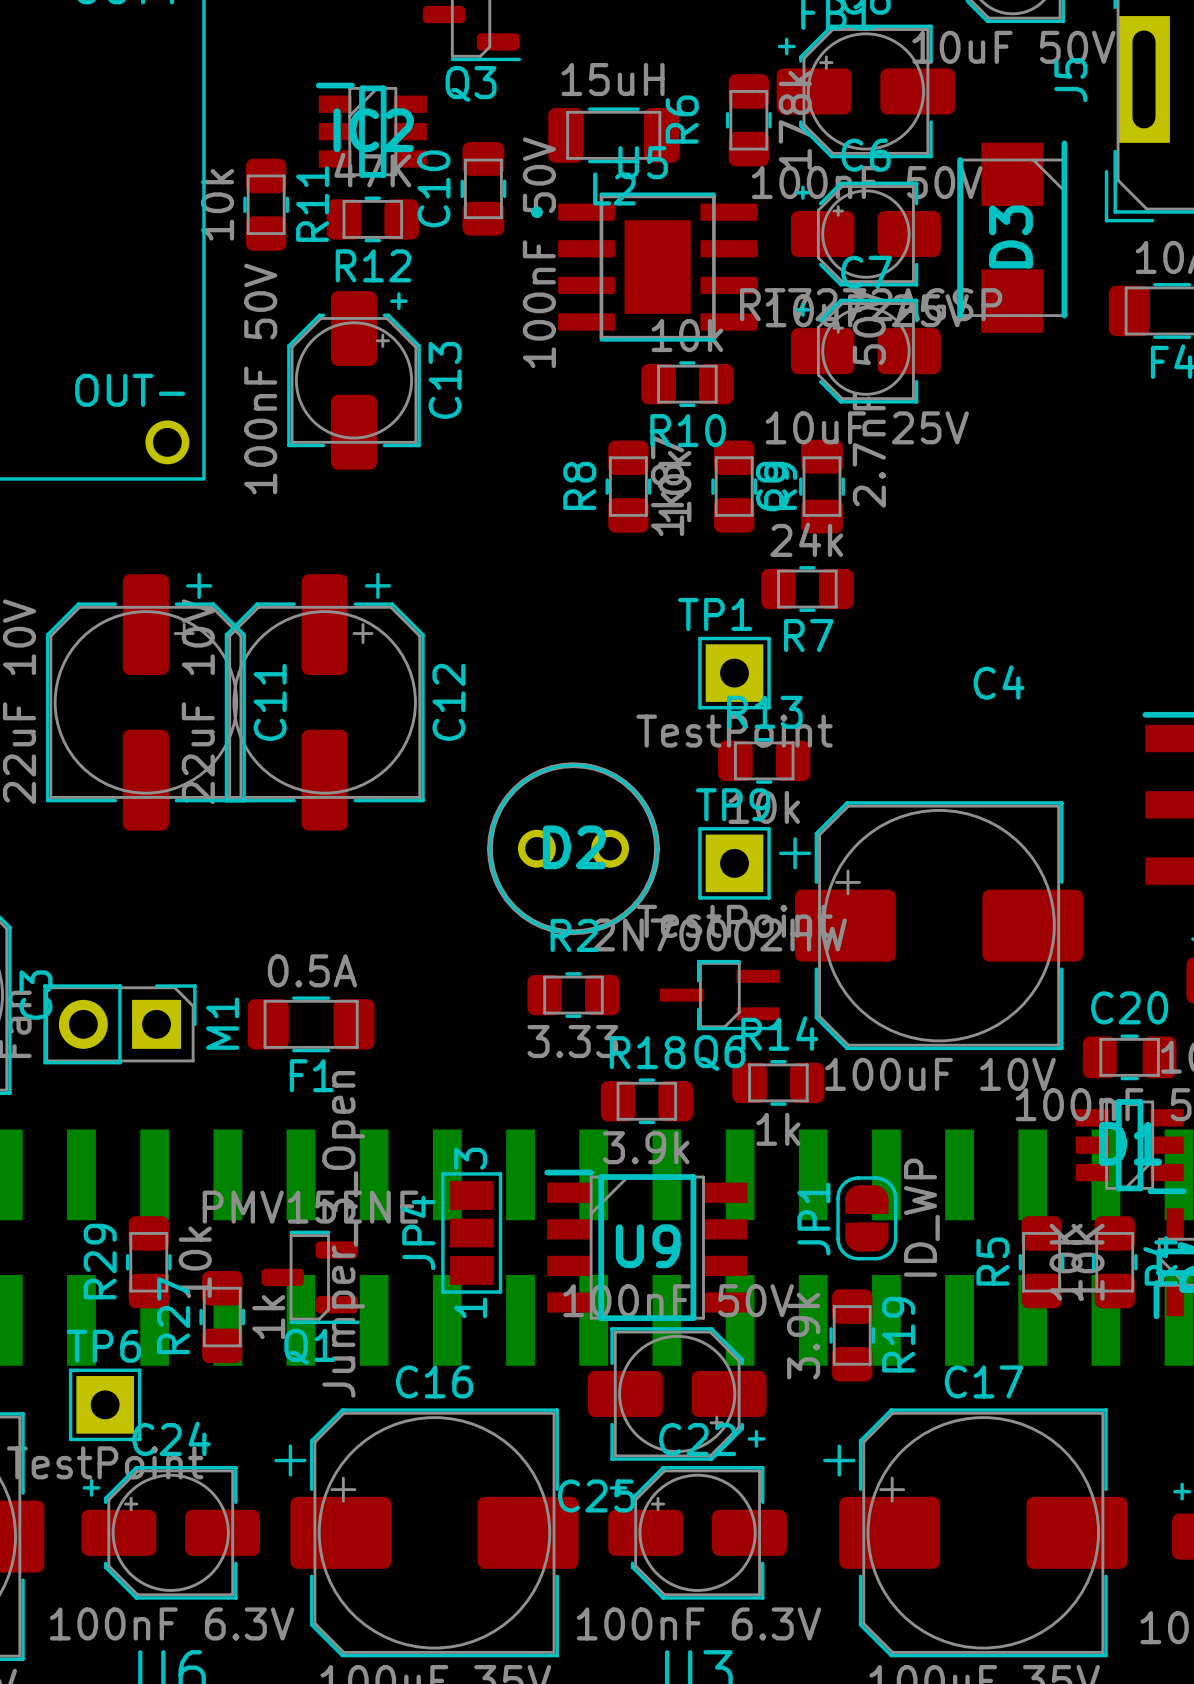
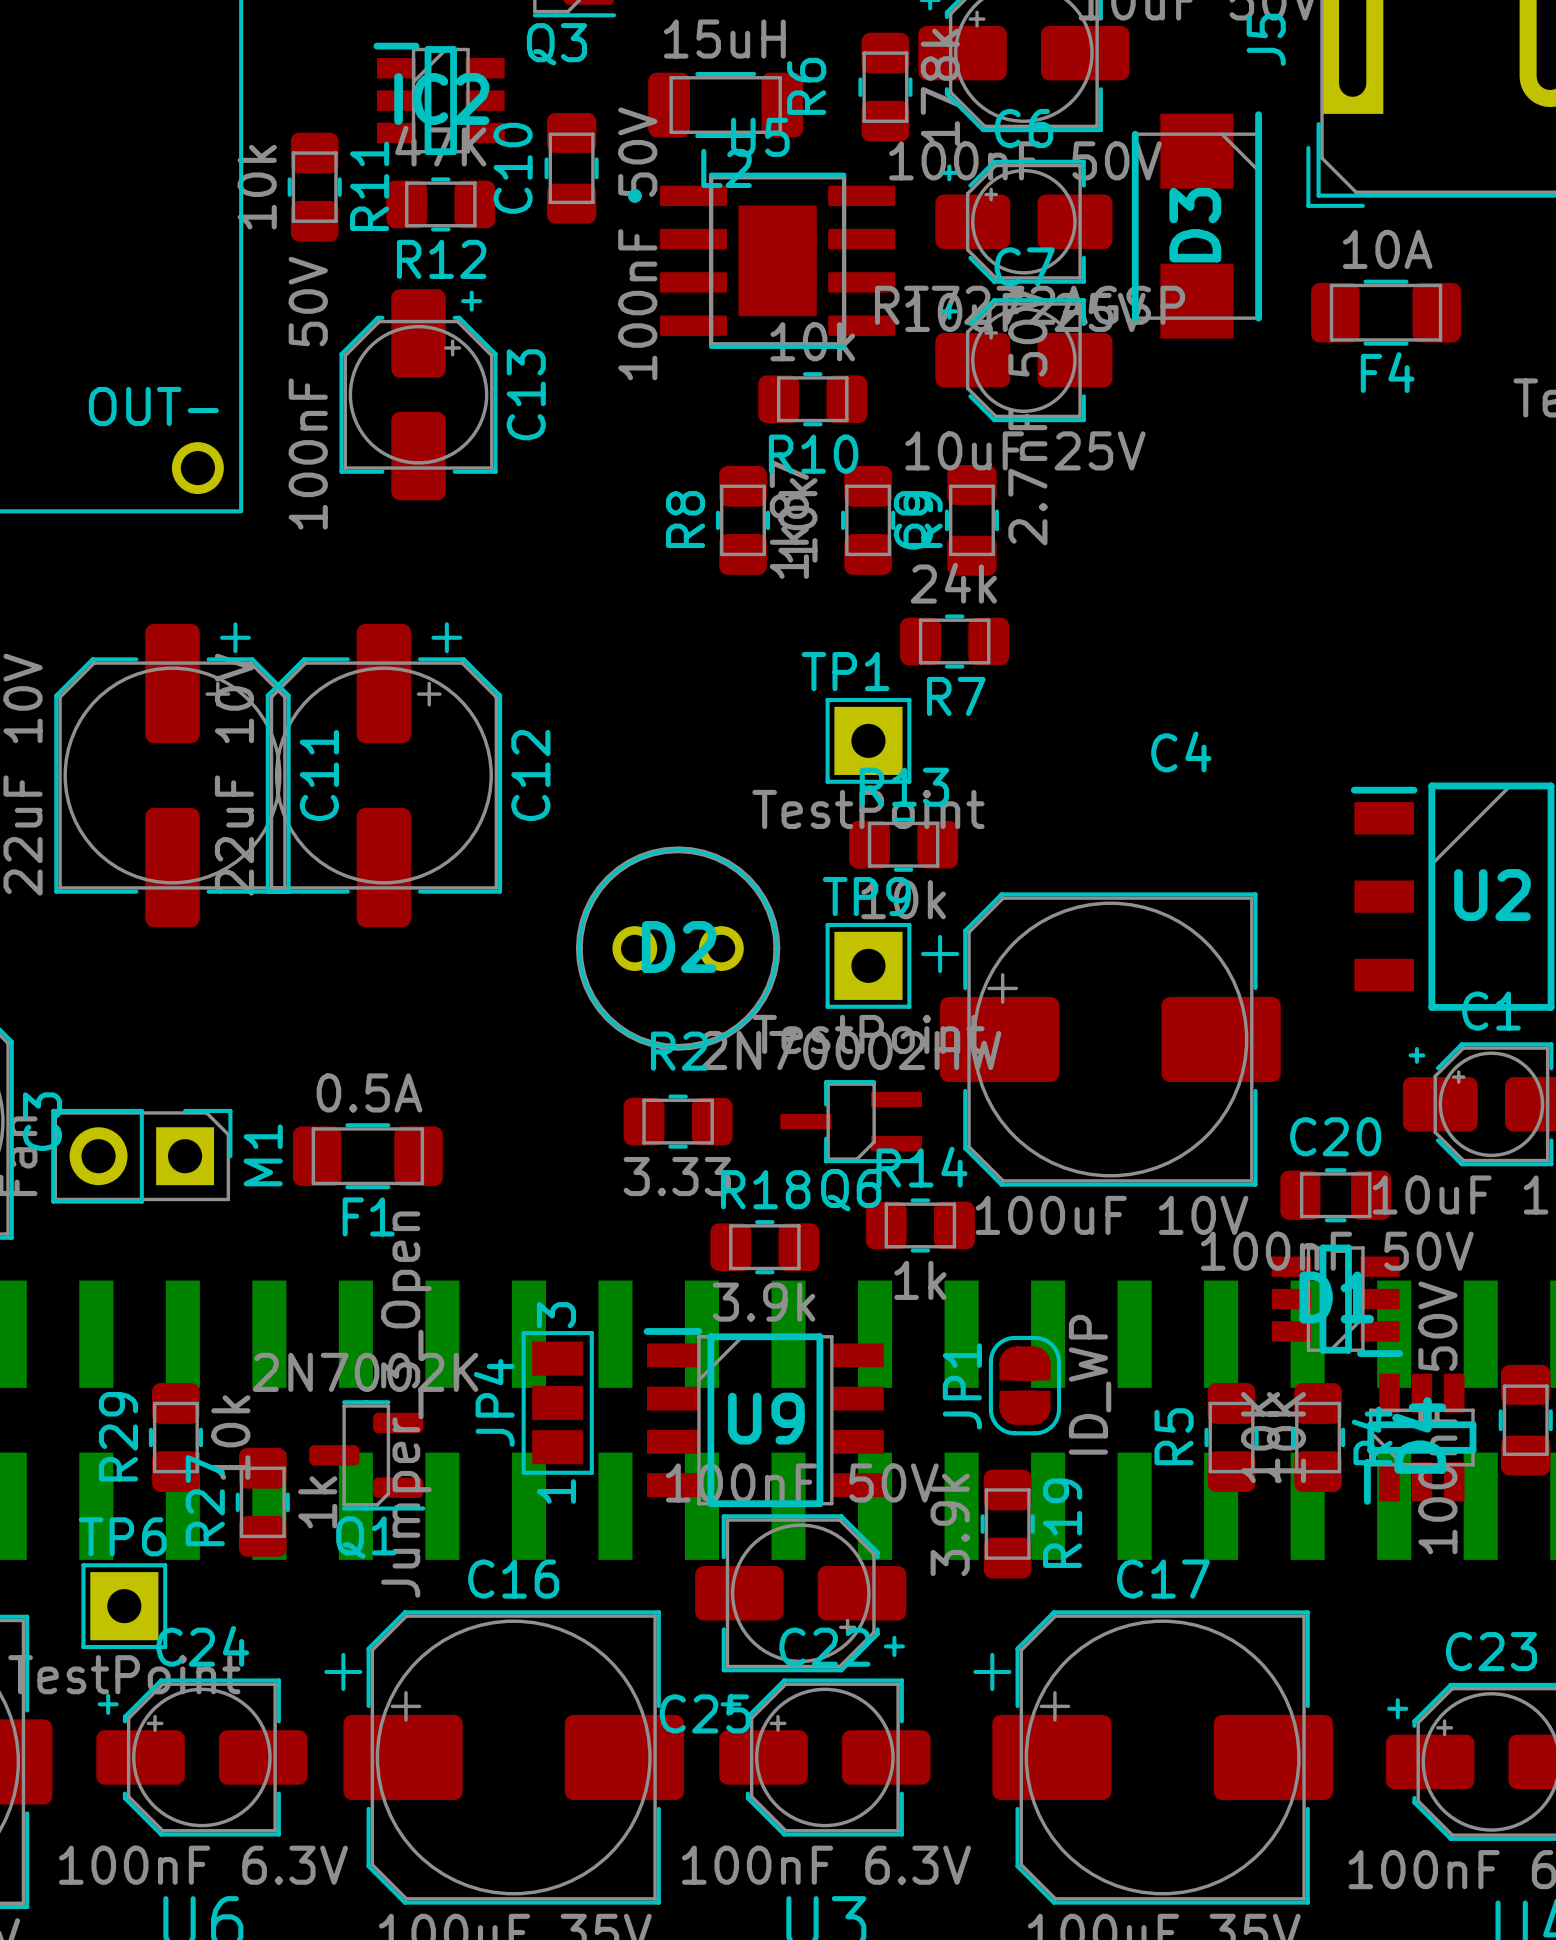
Q1 value: PMV15ENE (310, 1207) -> 2N7002K (365, 1372)

